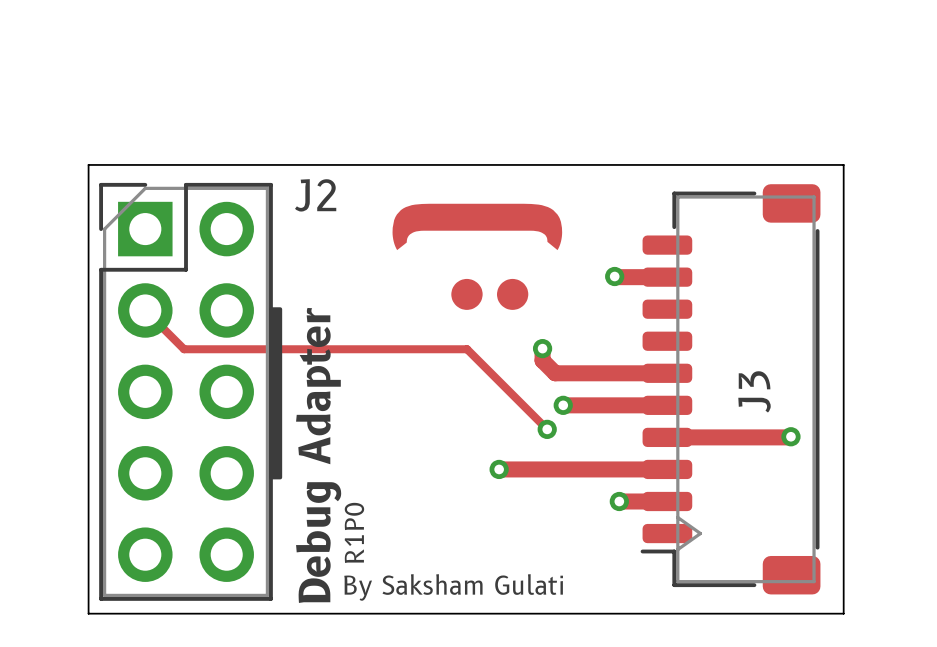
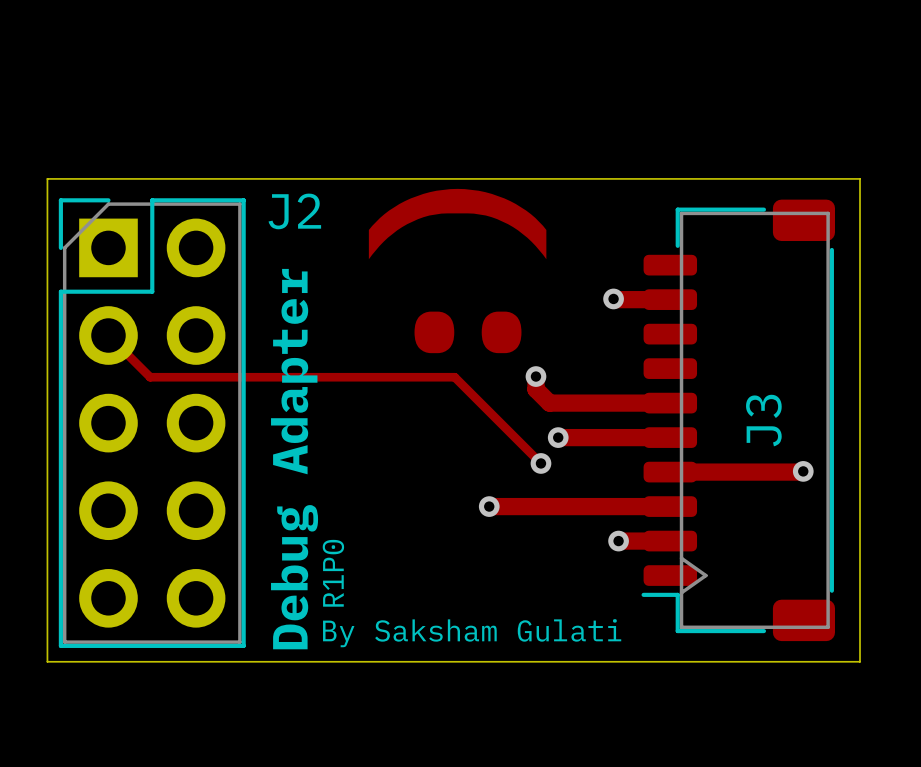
J2 footprint: [99, 182, 283, 601] -> [58, 198, 246, 648]

